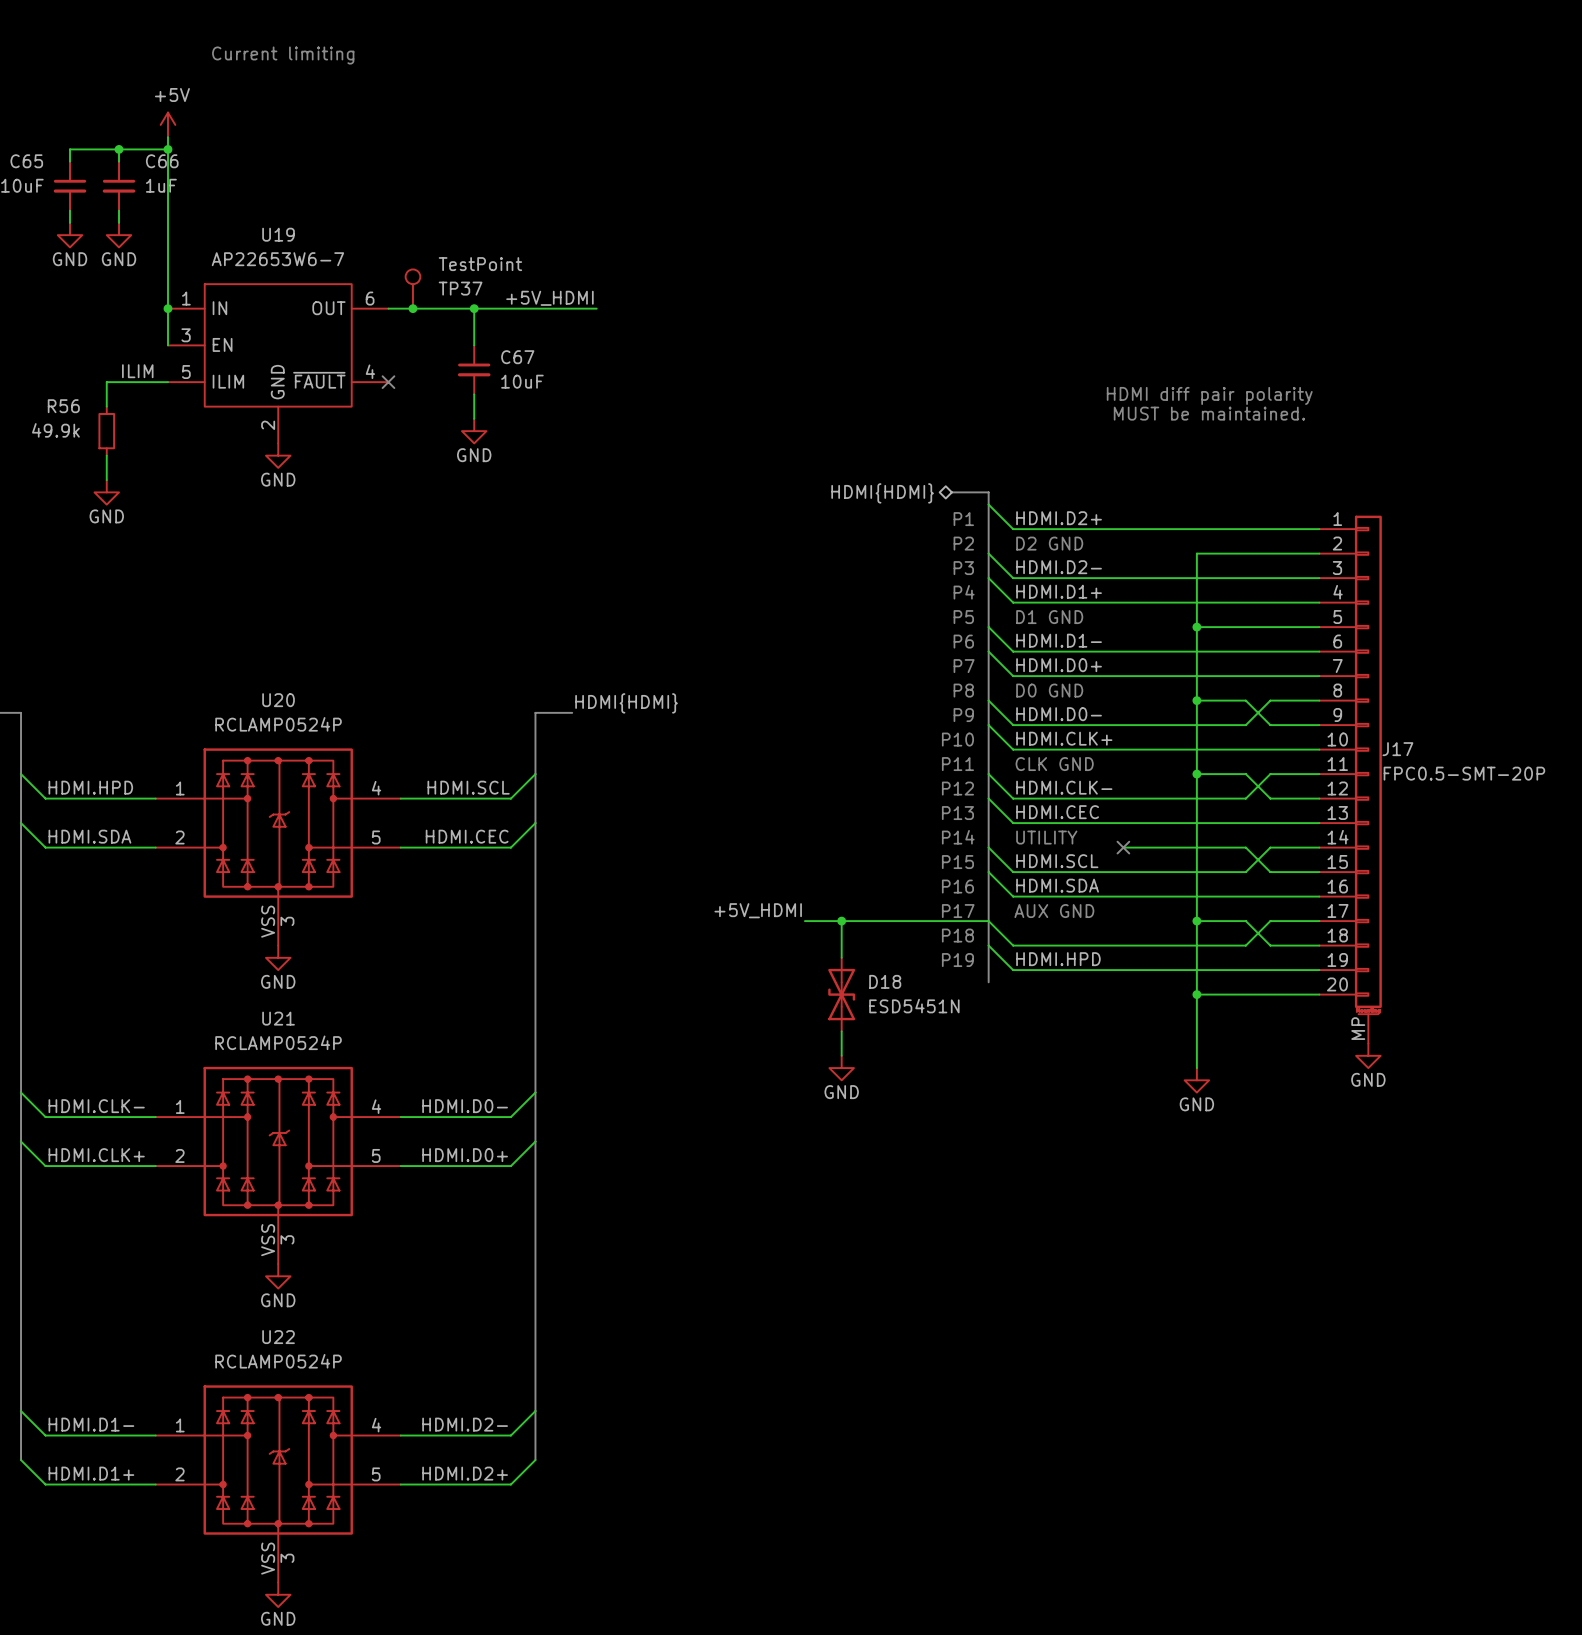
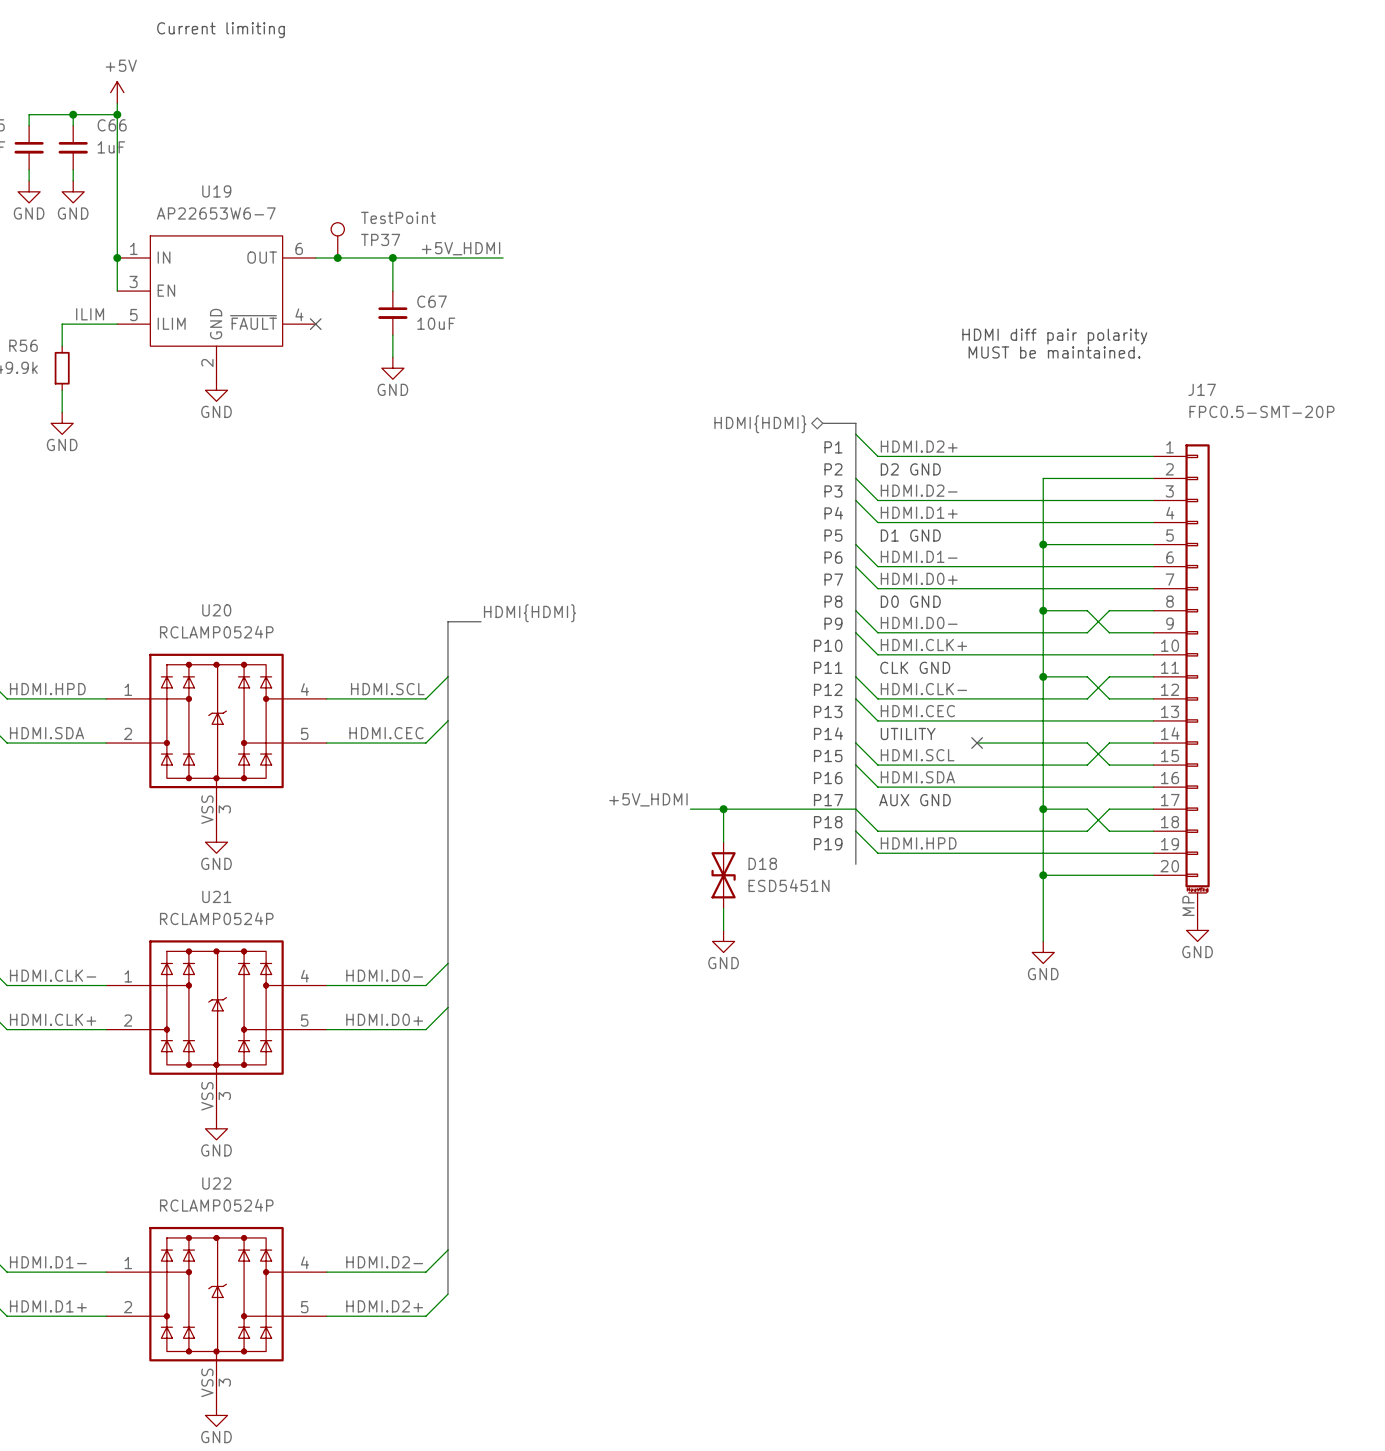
J17 name position: J17 (1397, 749) -> J17 (1202, 389)
J17 value position: FPC0.5-SMT-20P (1464, 773) -> FPC0.5-SMT-20P (1261, 411)

